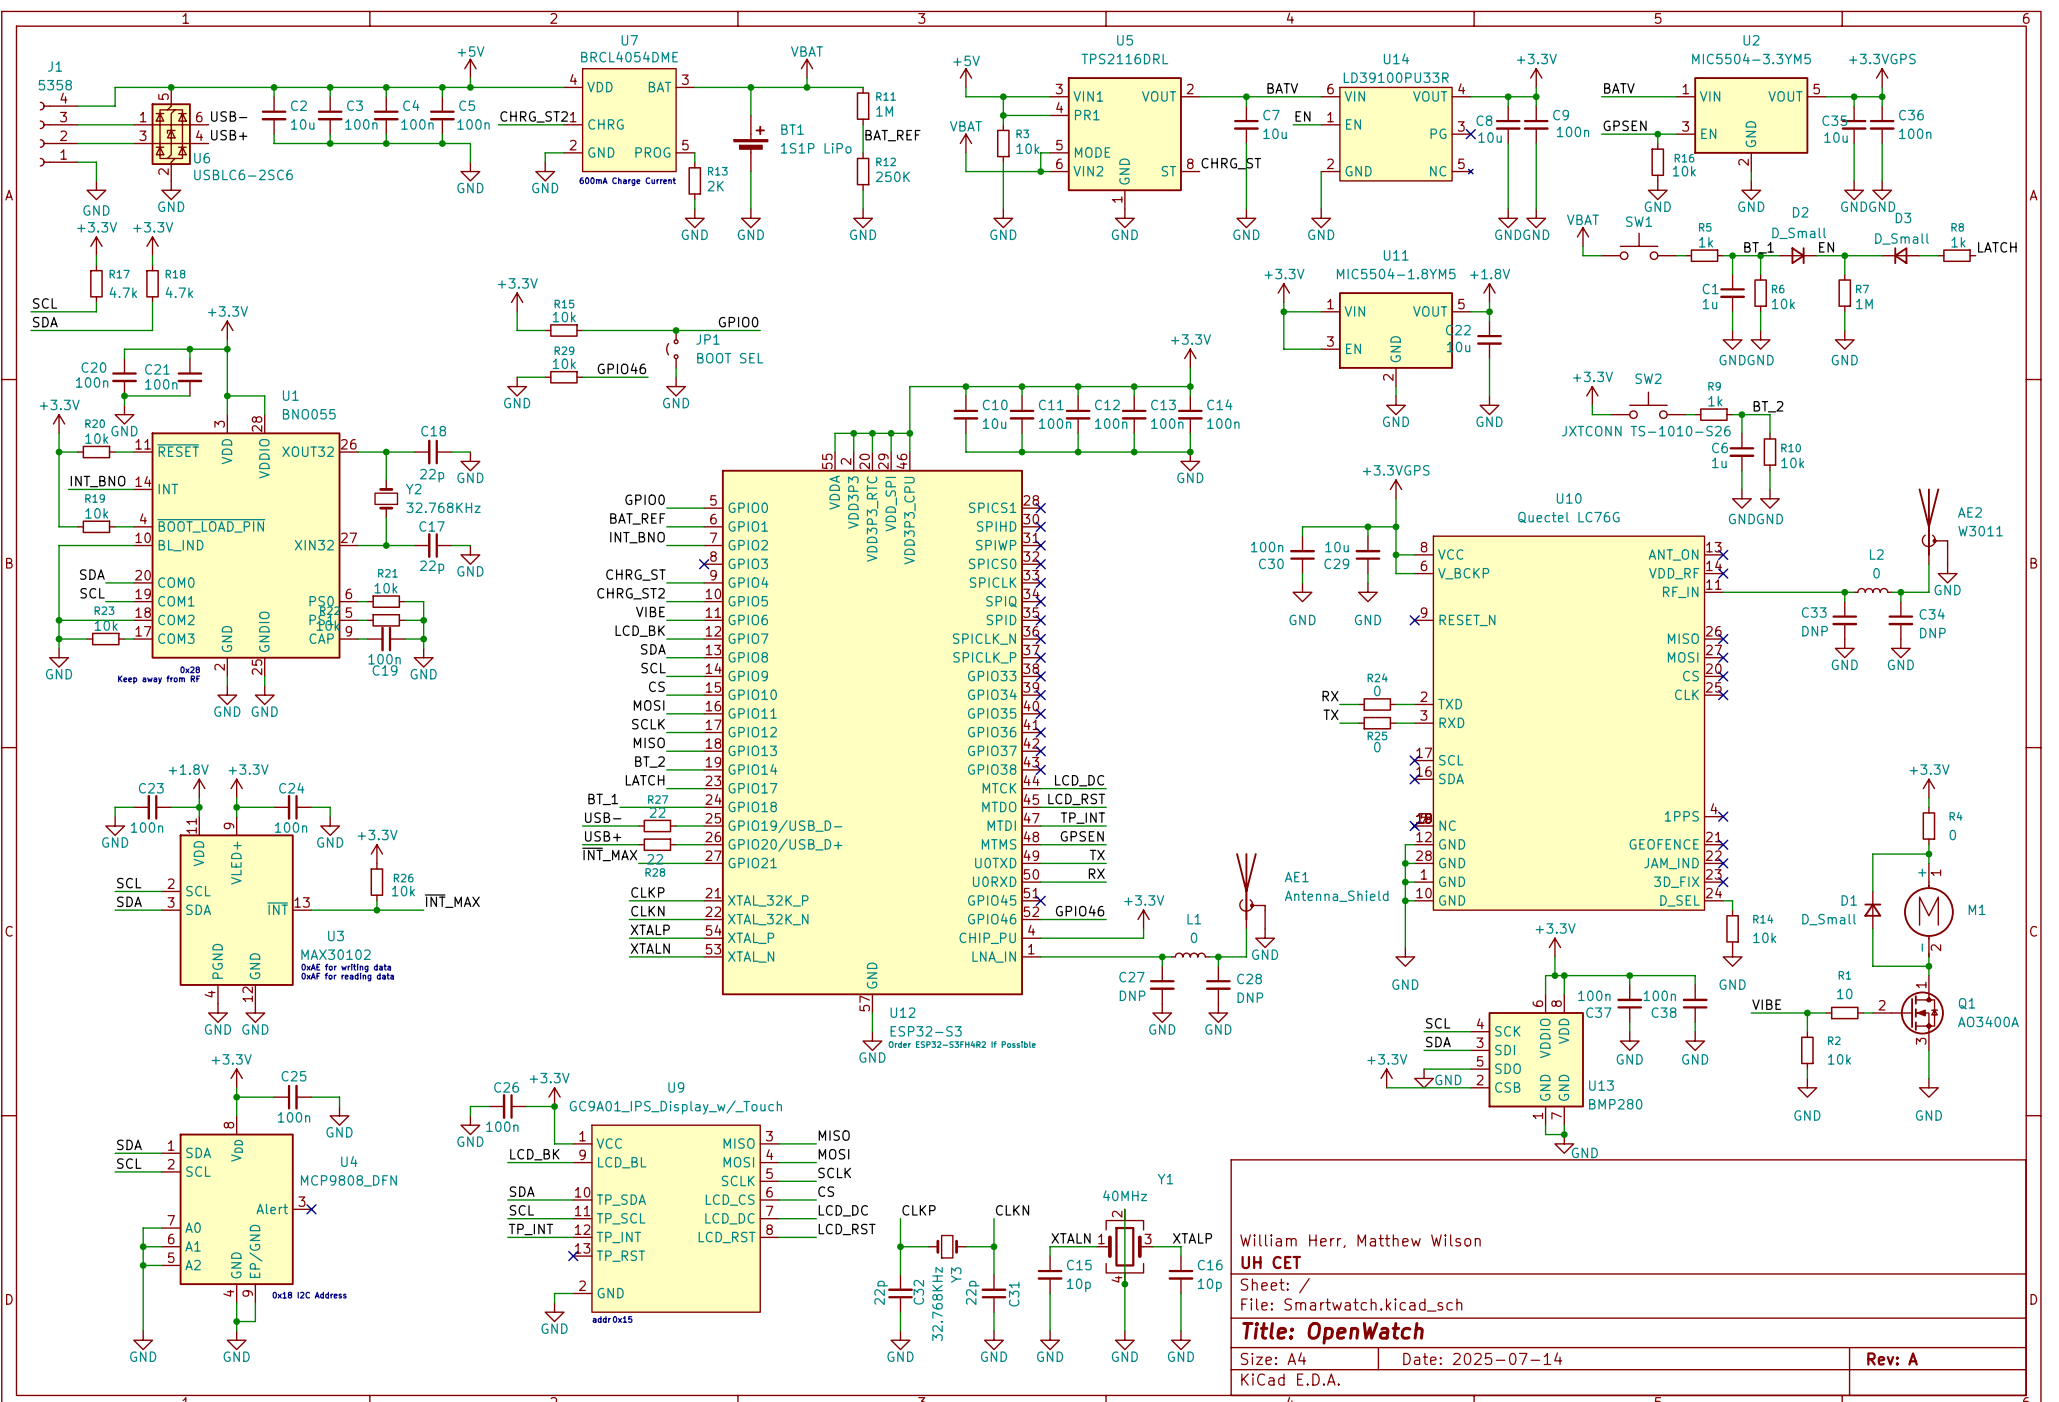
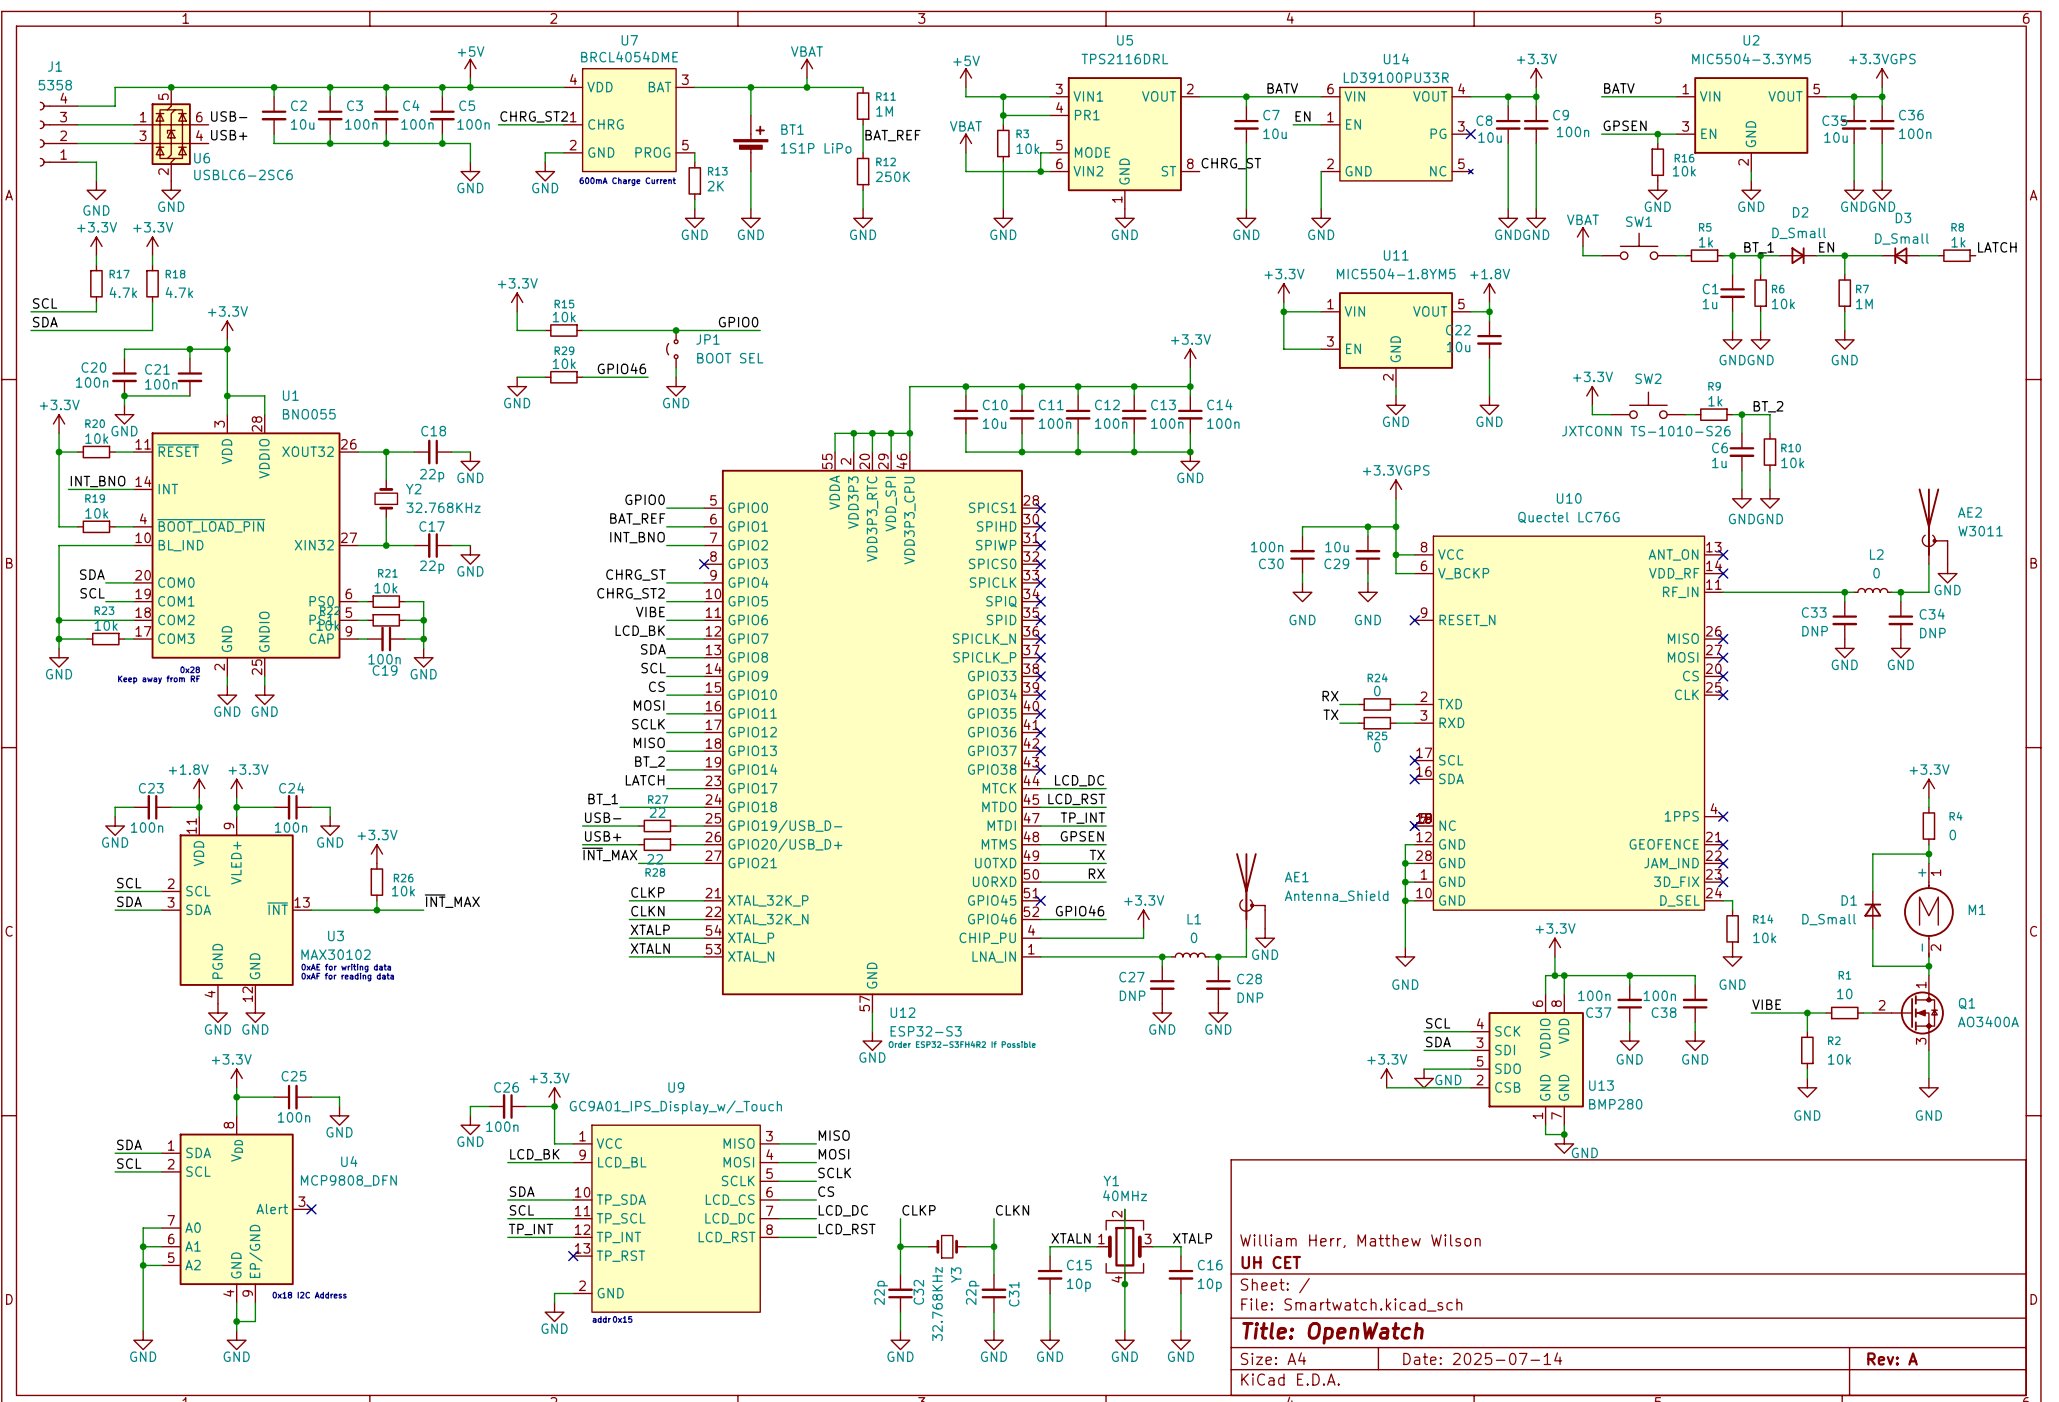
Y1 name position: Y1 (1165, 1179) -> Y1 (1111, 1180)

